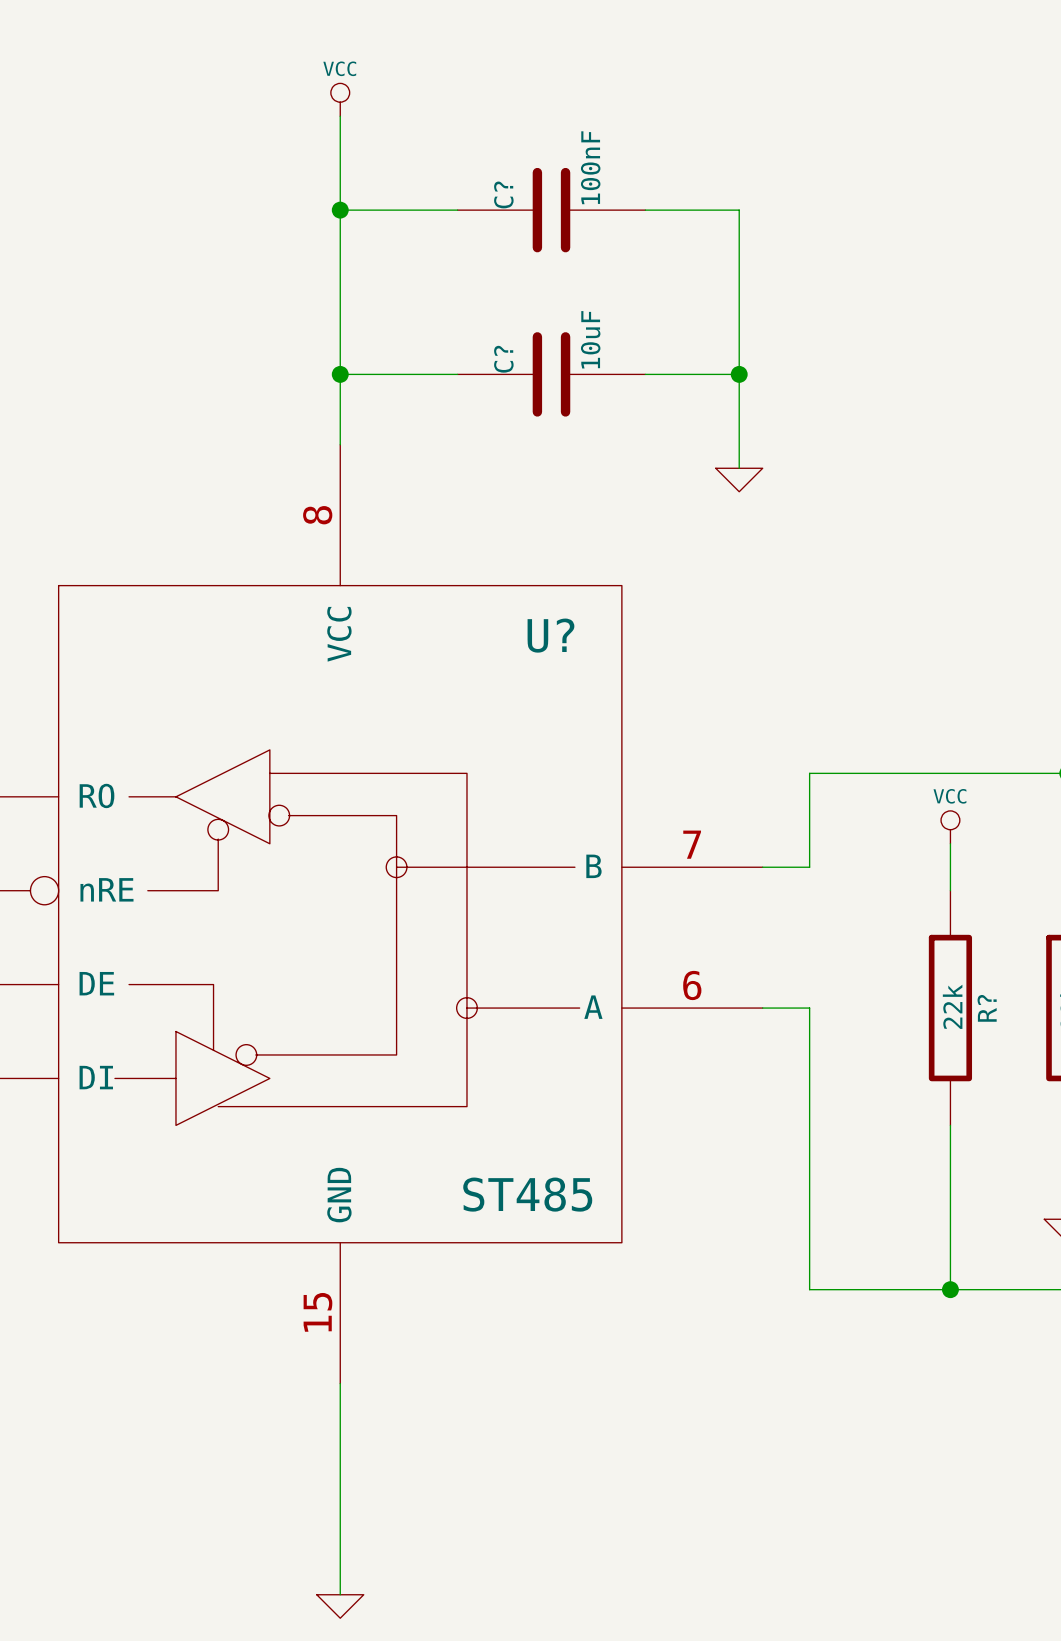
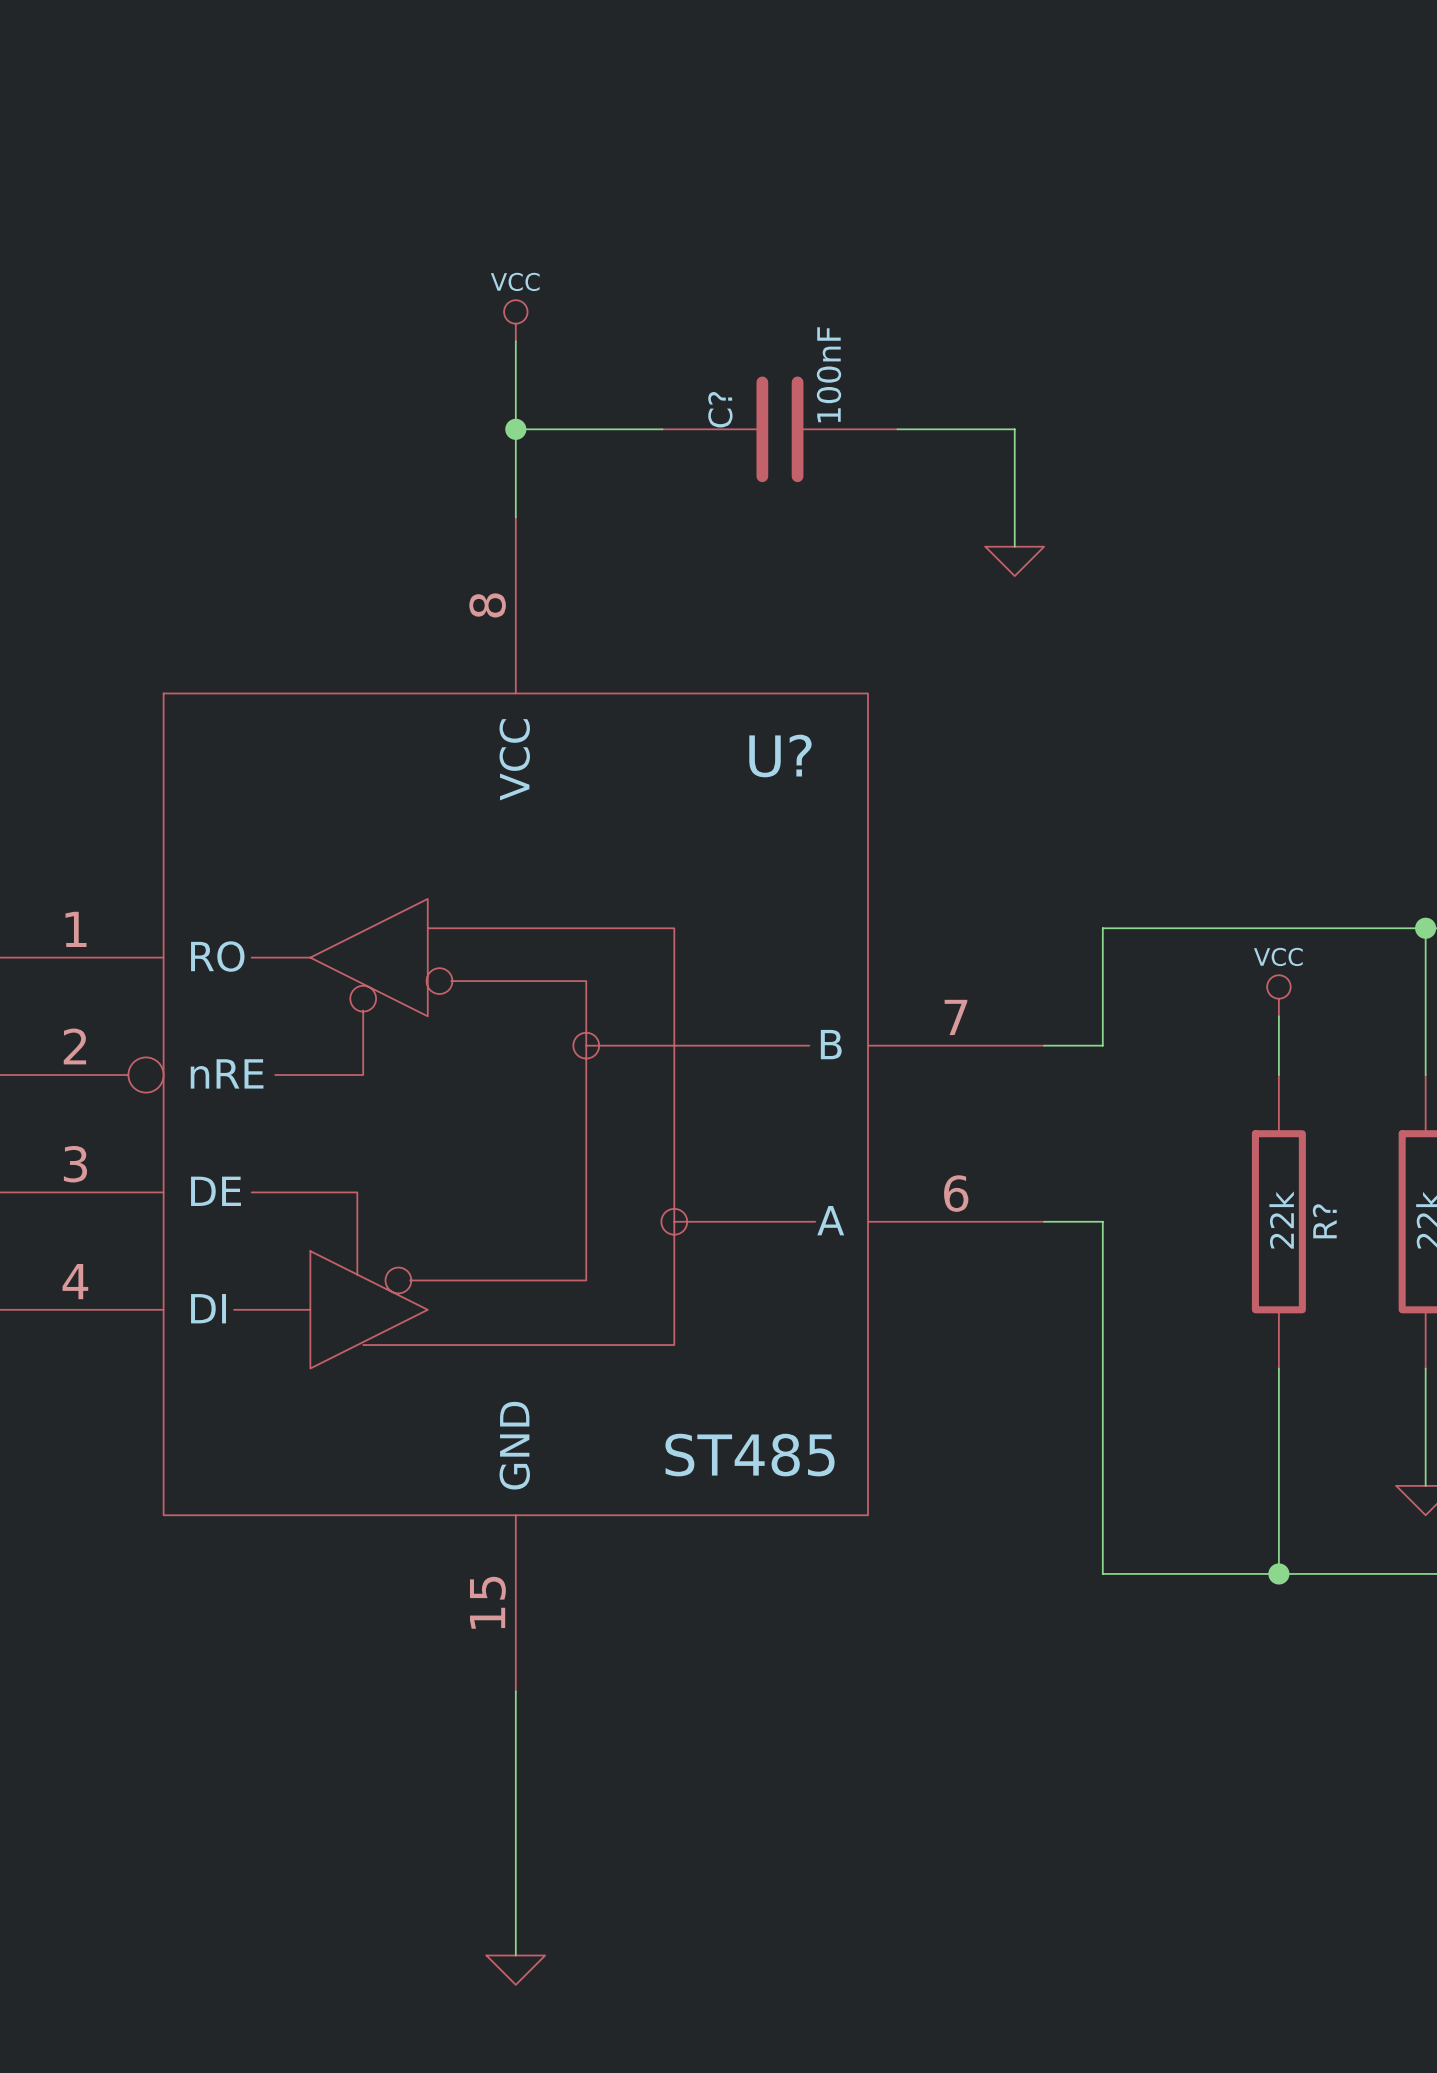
power symbol position: VCC (340, 99) -> VCC (515, 320)
wire: (340, 116) (340, 304) -> none
wire: (340, 210) (457, 210) -> none
junction: (340, 210) -> none
C?: 100nF (551, 210) -> none
wire: (645, 210) (739, 210) (739, 374) -> none
C? value: 10uF (590, 339) -> 100nF (828, 374)
junction: (739, 374) -> none

